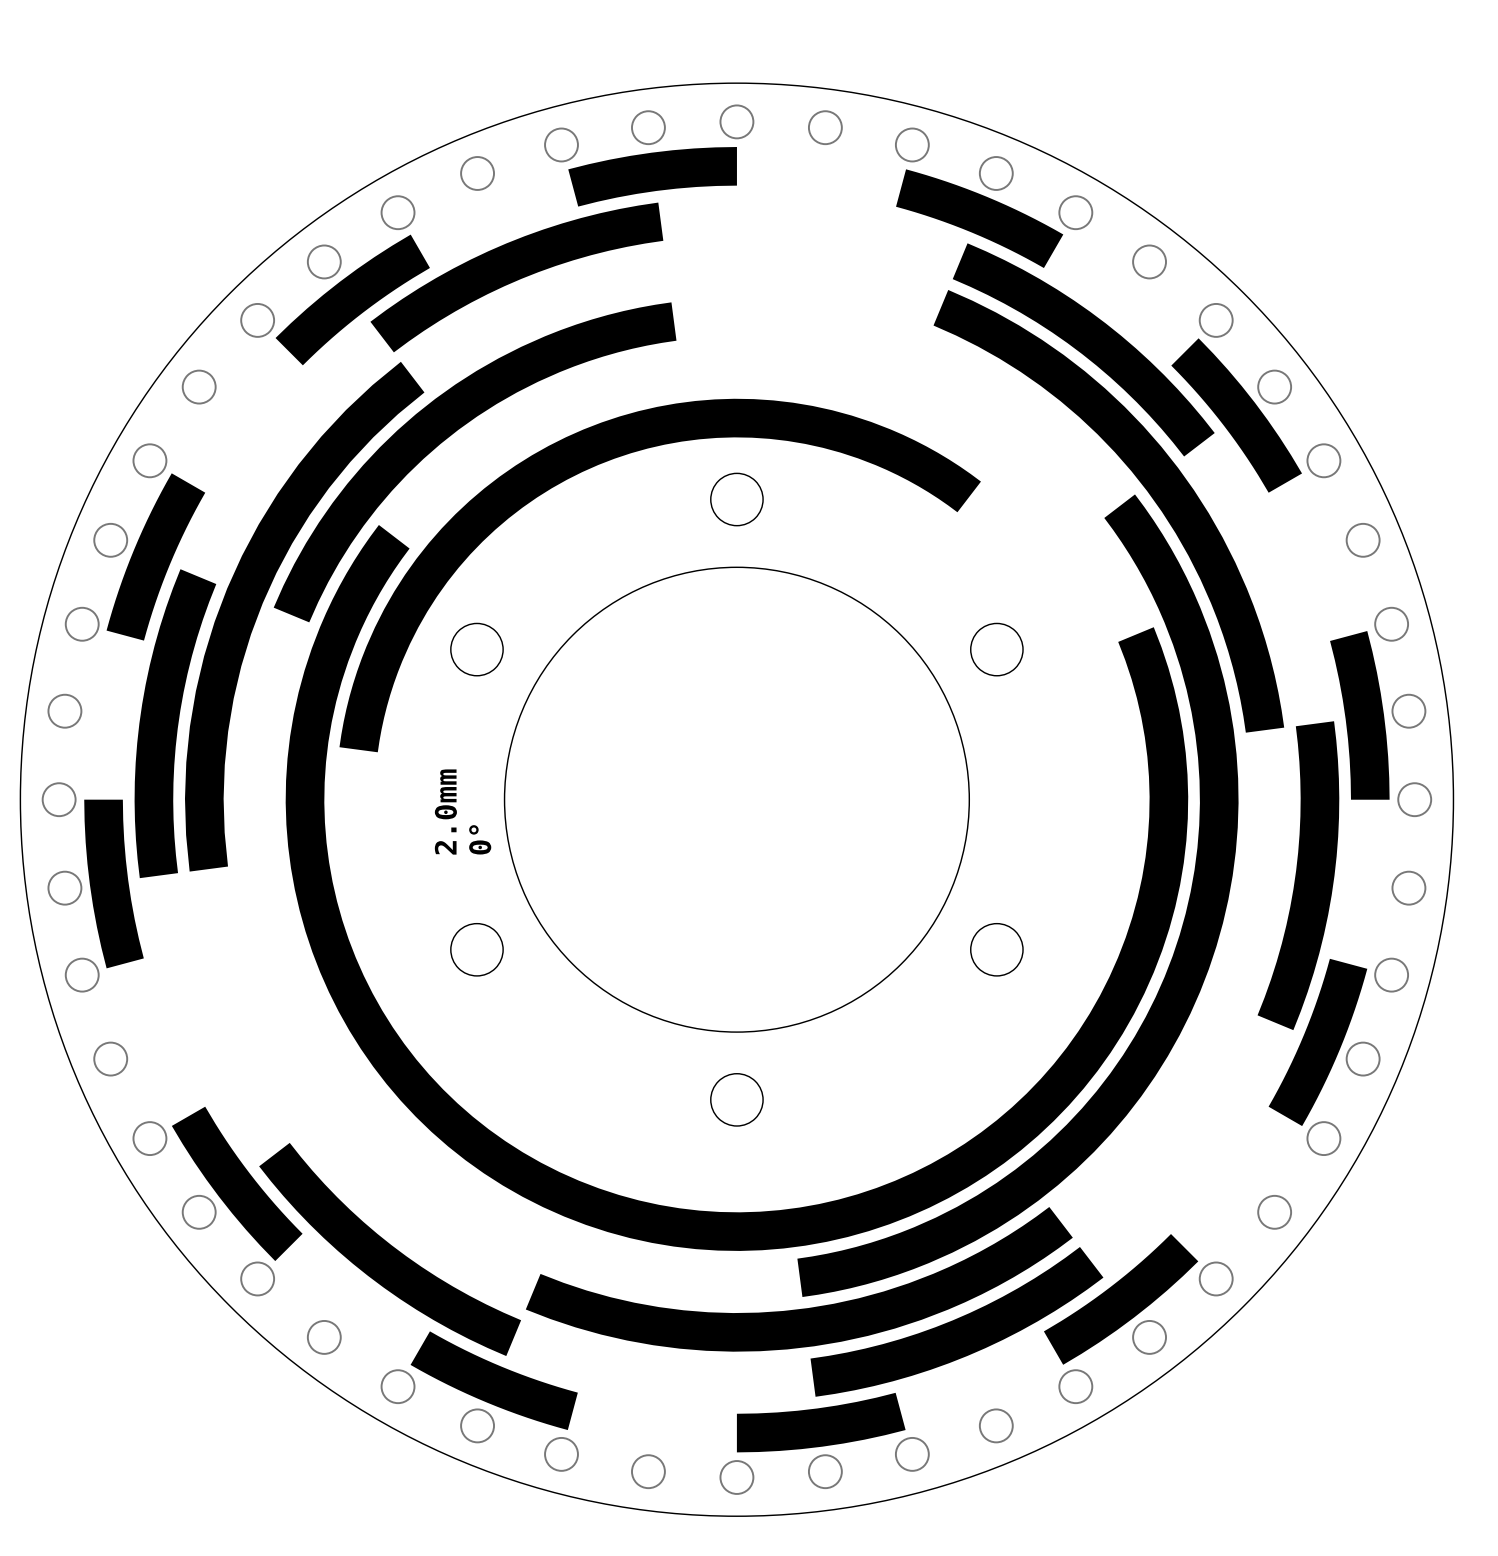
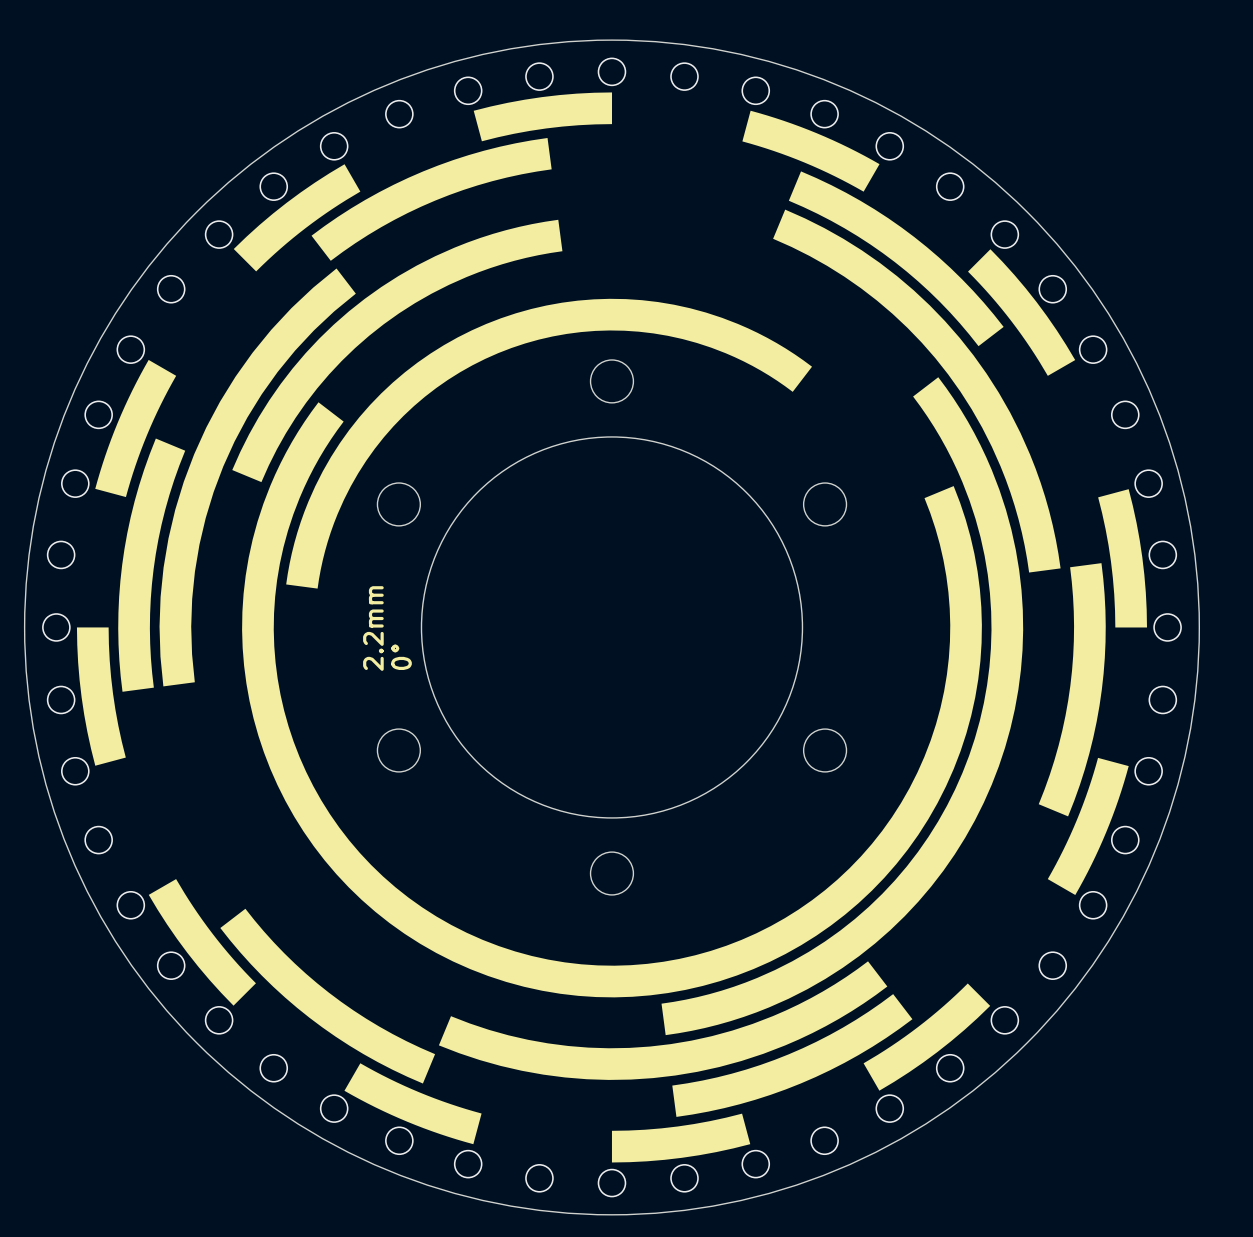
text: 2.0mm (445, 812) -> 2.2mm (373, 628)

